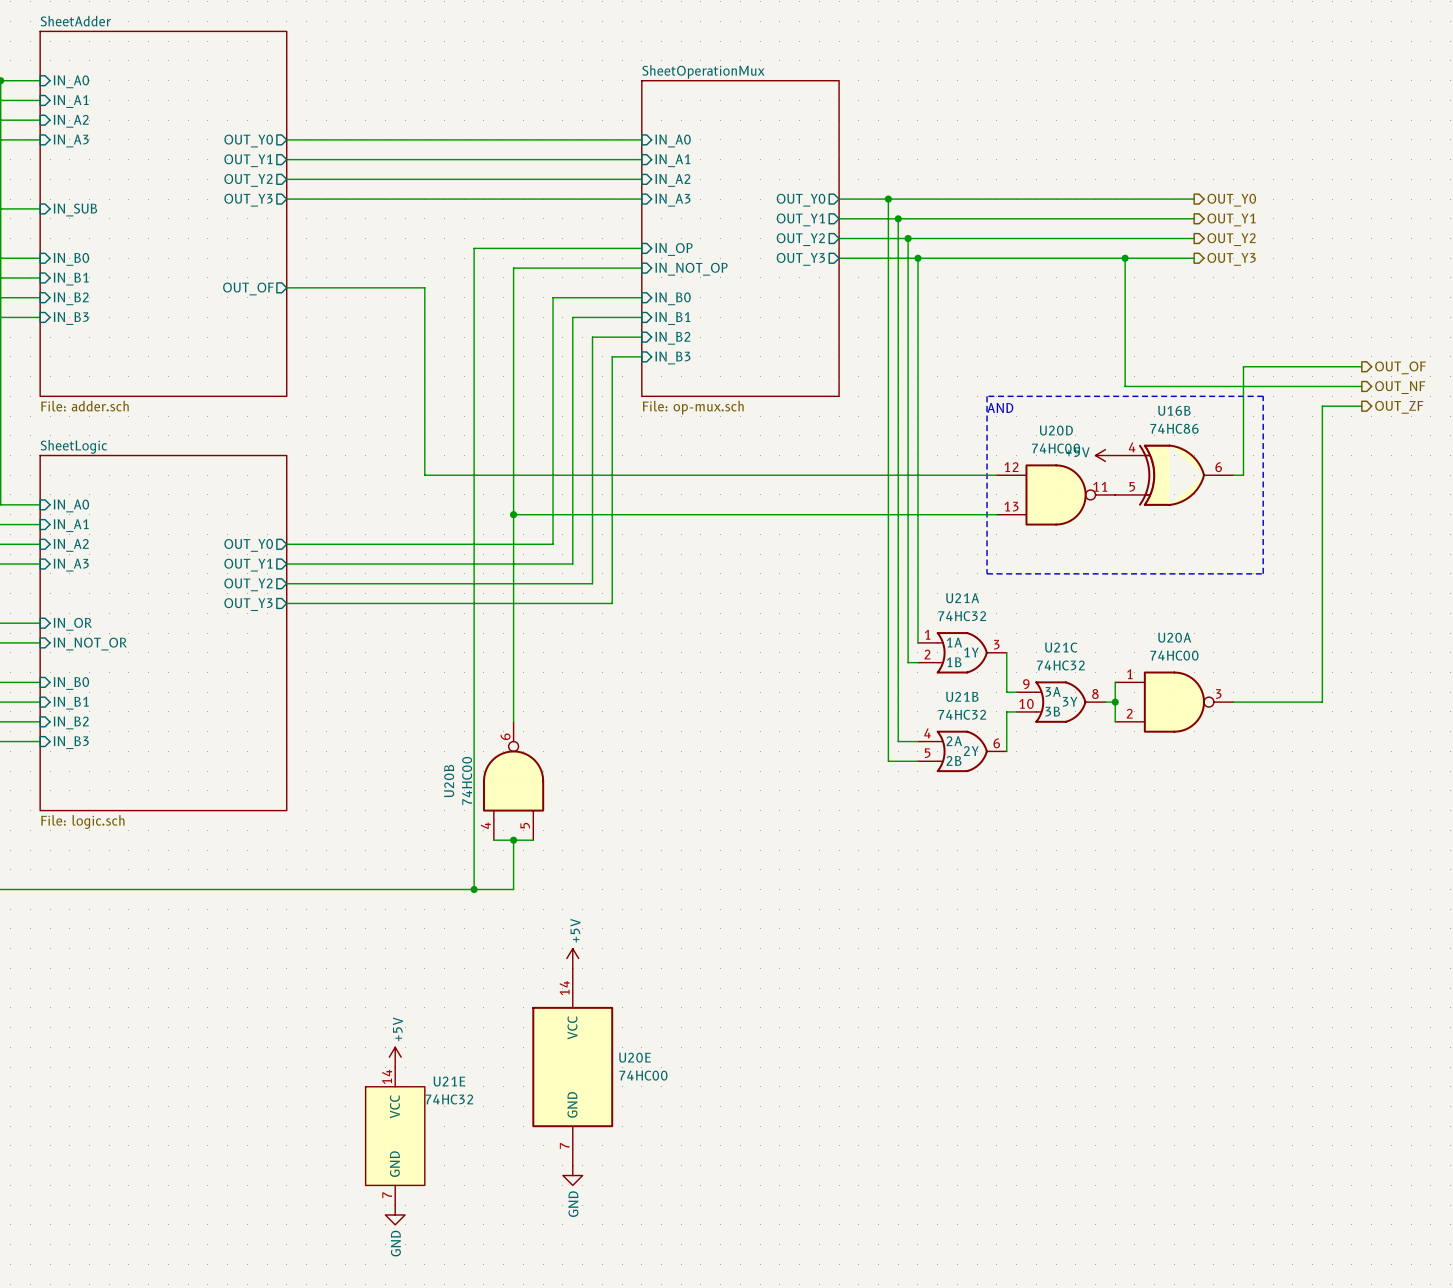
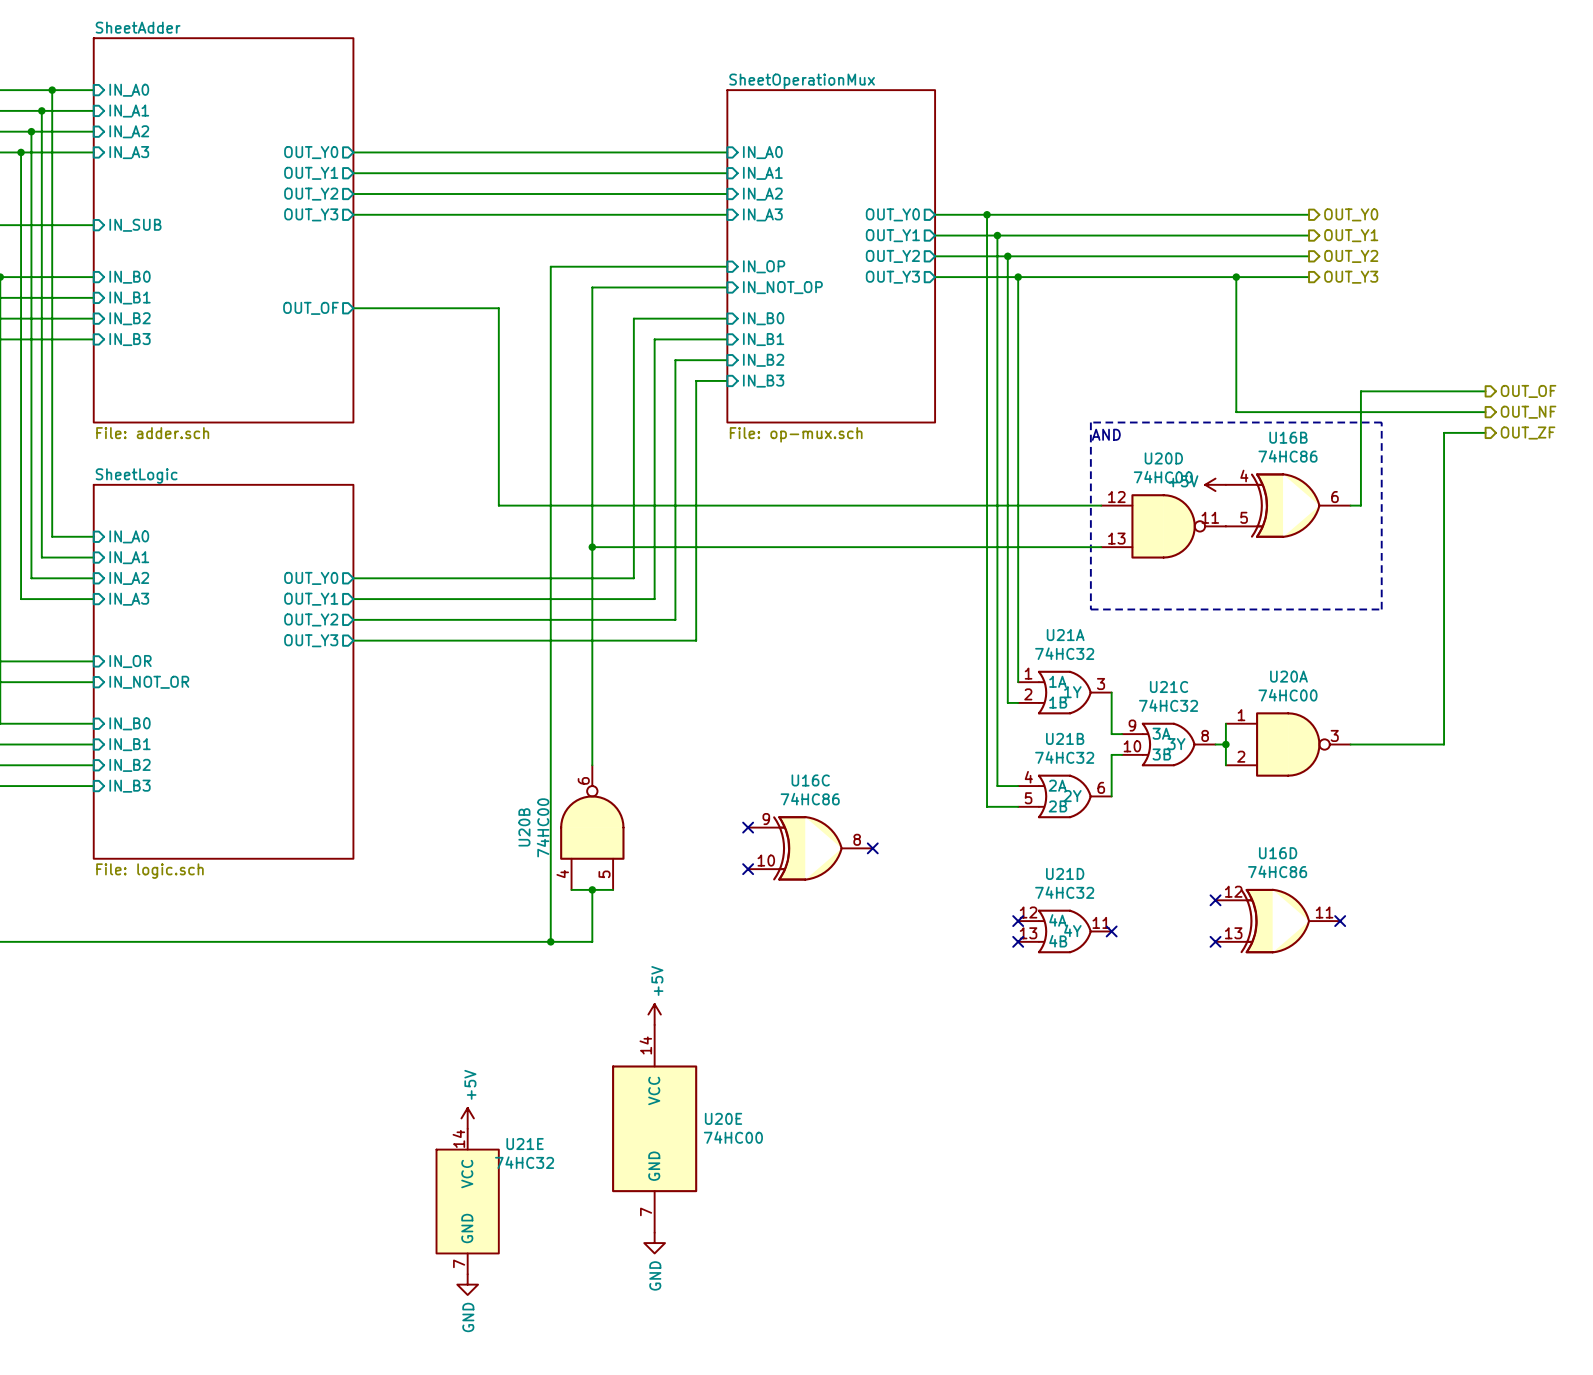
no-connect mark: none -> (748, 827)
U16C: none -> 74HC86 (810, 848)
no-connect mark: none -> (872, 848)
no-connect mark: none -> (748, 869)
no-connect mark: none -> (1215, 900)
no-connect mark: none -> (1018, 921)
U16D: none -> 74HC86 (1277, 921)
no-connect mark: none -> (1340, 921)
U21D: none -> 74HC32 (1064, 931)
no-connect mark: none -> (1111, 931)
no-connect mark: none -> (1018, 941)
no-connect mark: none -> (1215, 941)

